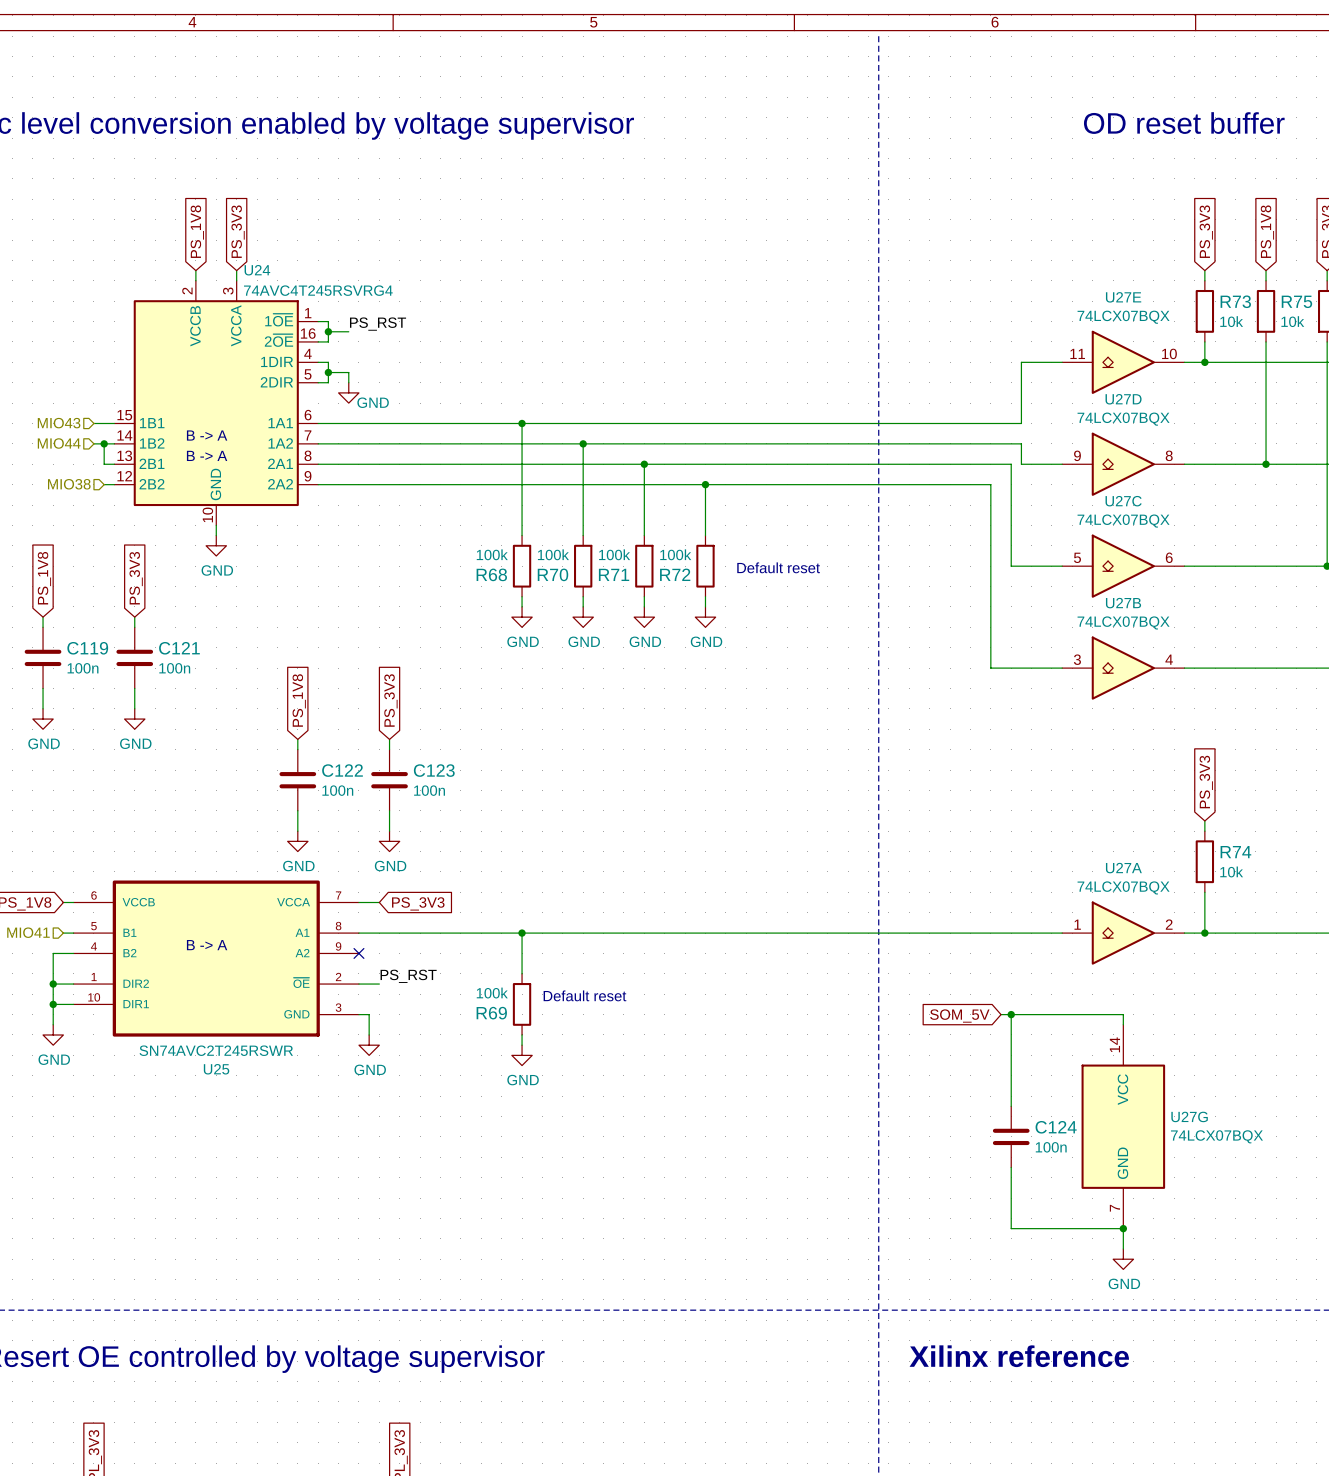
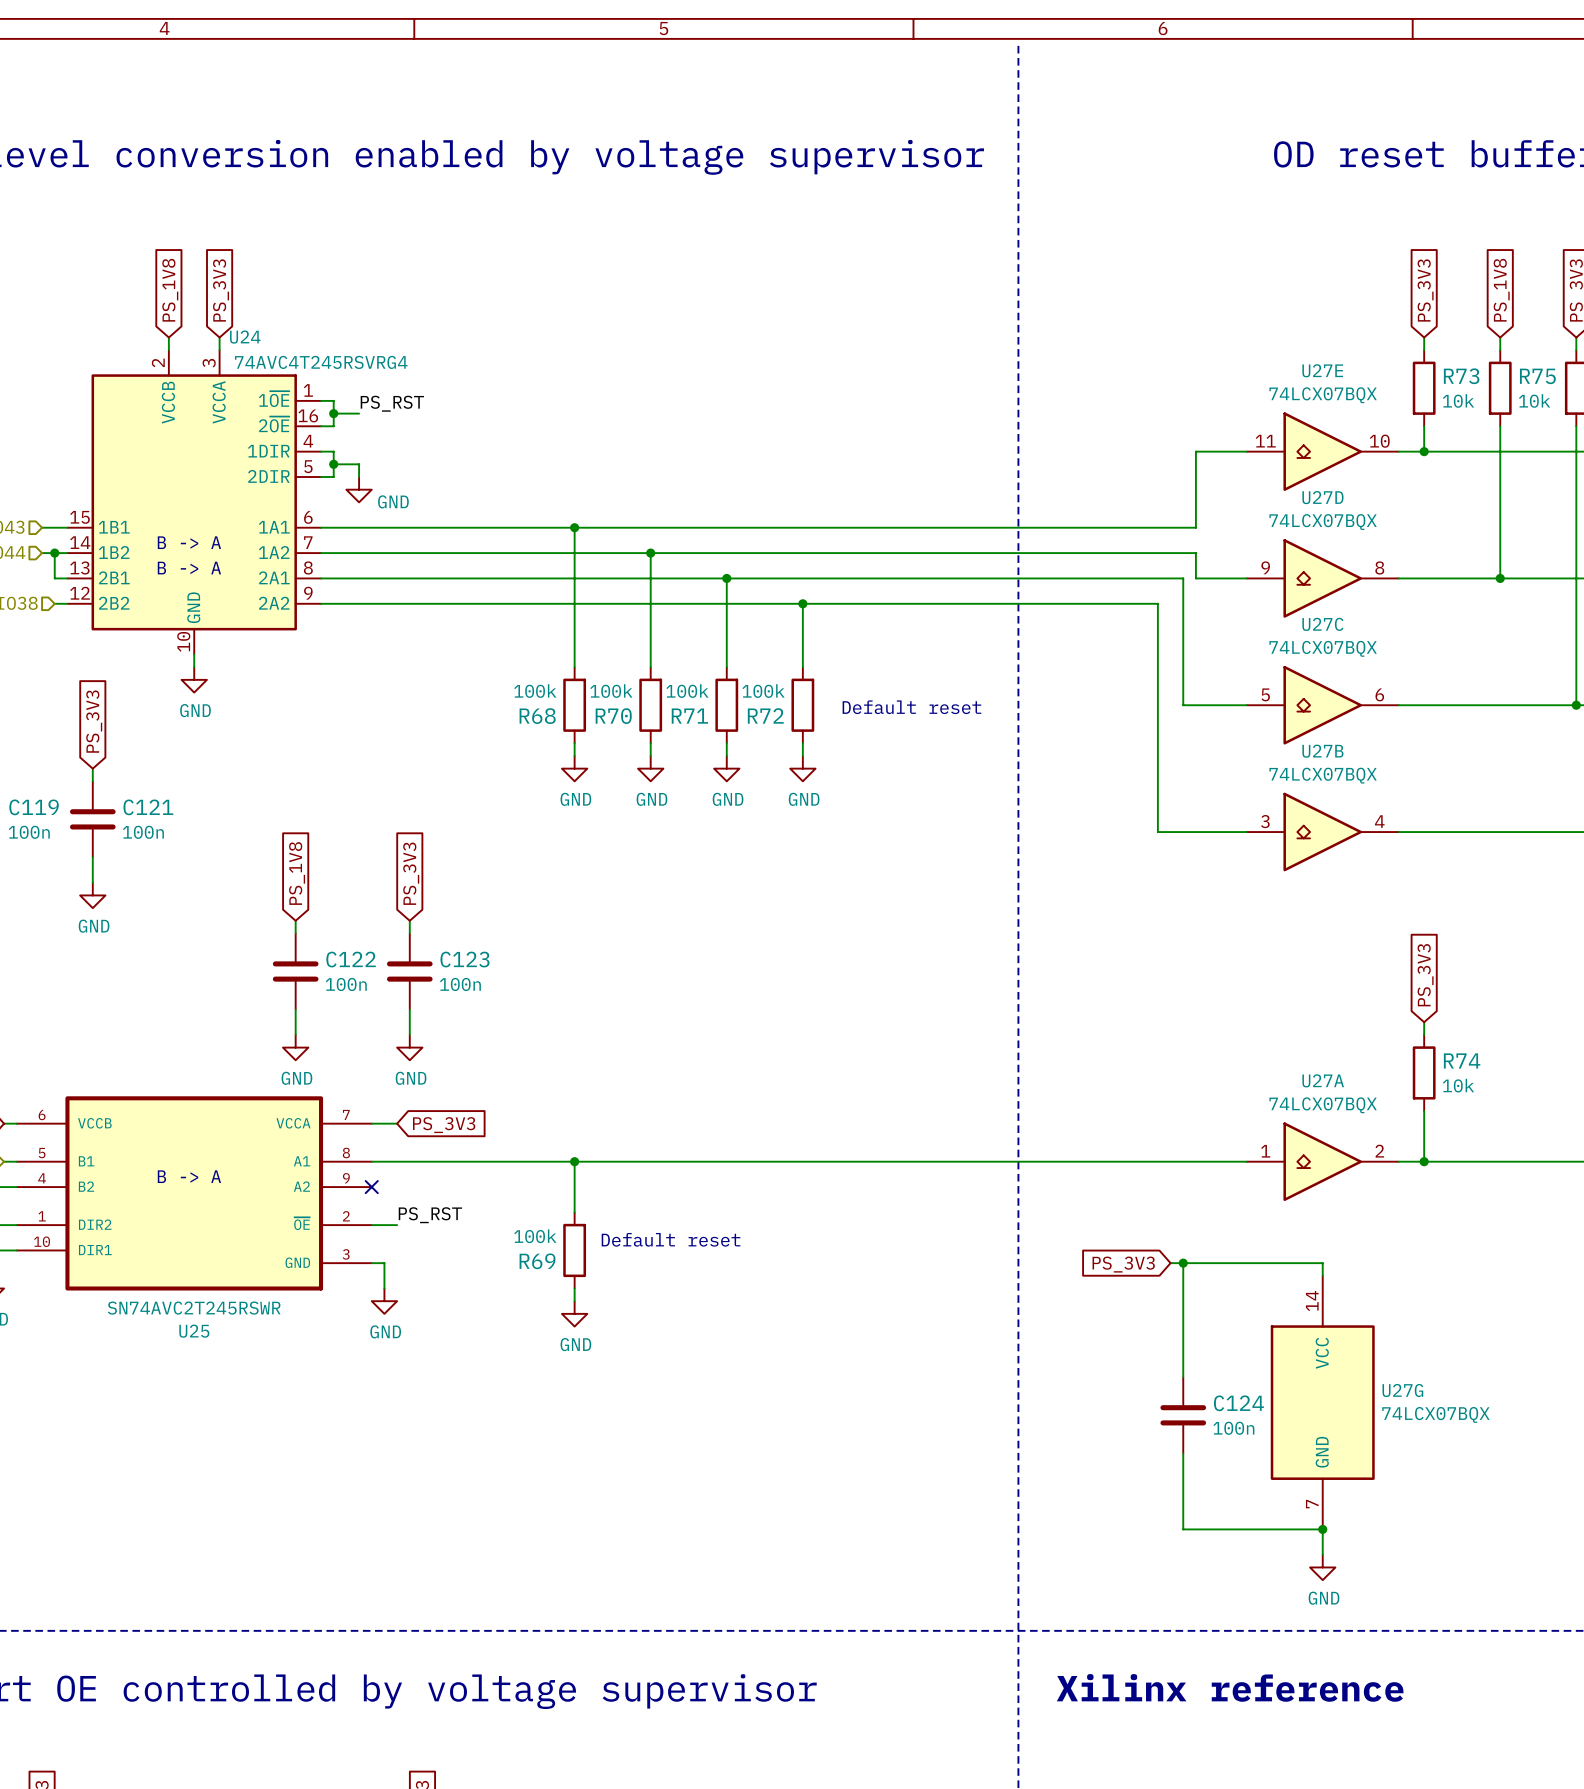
global label: SOM_5V (959, 1016) -> PS_3V3 (1123, 1264)

